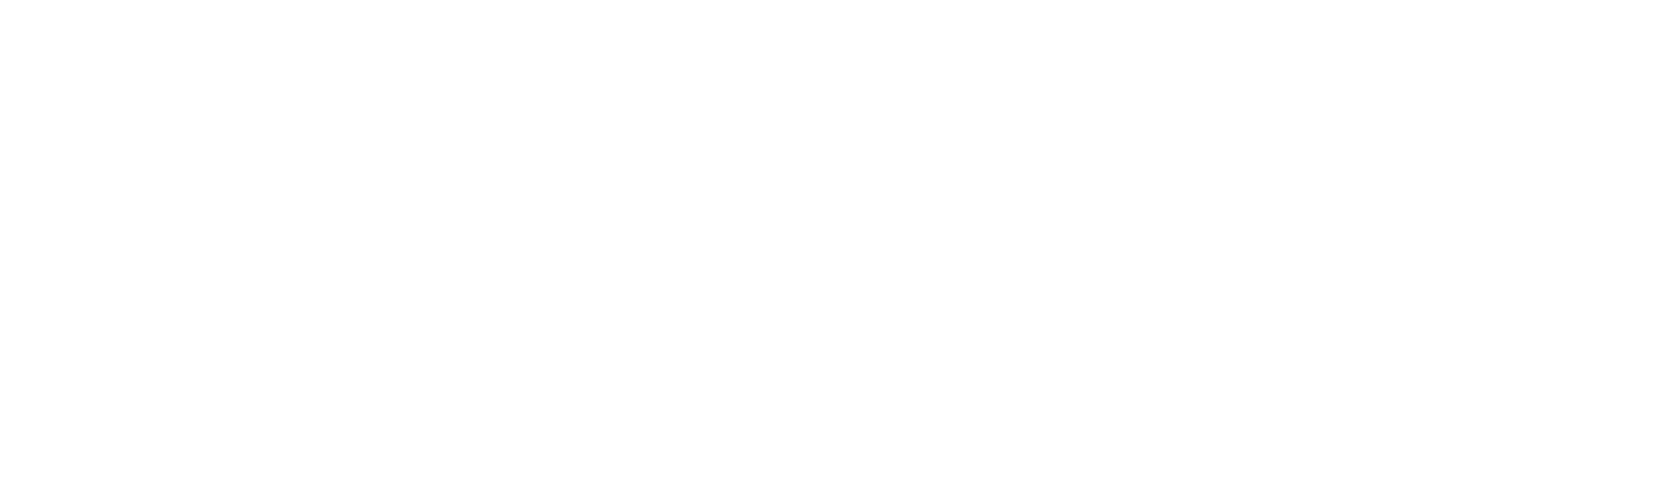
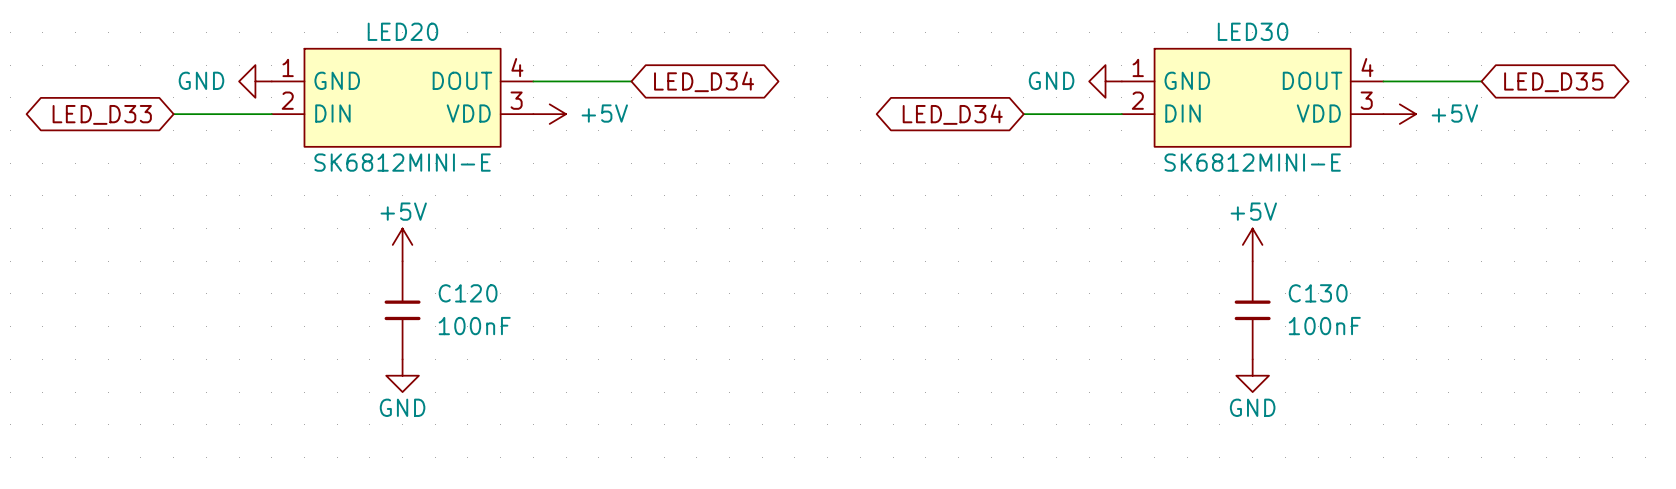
power symbol: none -> GND (255, 81)
wire: none -> (533, 81) (631, 81)
global label: none -> LED_D34 (704, 81)
power symbol: none -> GND (1105, 81)
wire: none -> (1383, 81) (1481, 81)
global label: none -> LED_D35 (1553, 82)
LED20: none -> SK6812MINI-E (402, 97)
LED30: none -> SK6812MINI-E (1252, 97)
global label: none -> LED_D33 (102, 114)
wire: none -> (173, 114) (271, 114)
power symbol: none -> +5V (549, 114)
global label: none -> LED_D34 (952, 114)
wire: none -> (1023, 114) (1121, 114)
power symbol: none -> +5V (1399, 114)
power symbol: none -> +5V (402, 244)
power symbol: none -> +5V (1252, 244)
C120: none -> 100nF (402, 310)
C130: none -> 100nF (1252, 310)
power symbol: none -> GND (402, 375)
power symbol: none -> GND (1252, 375)

